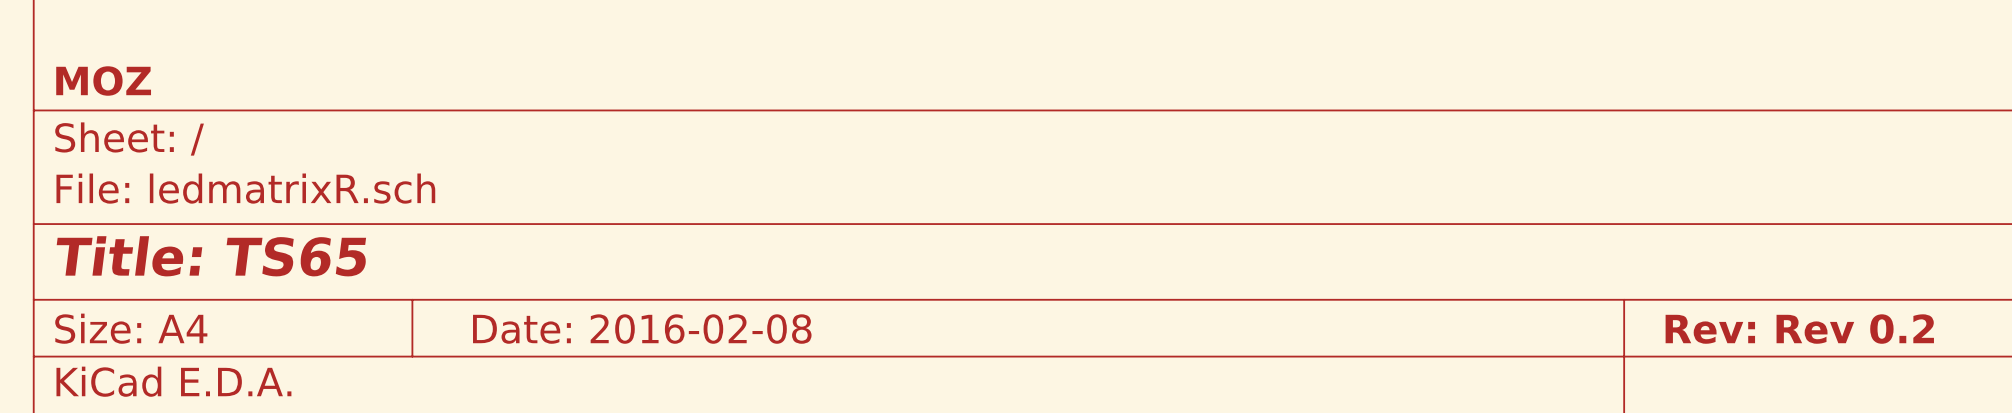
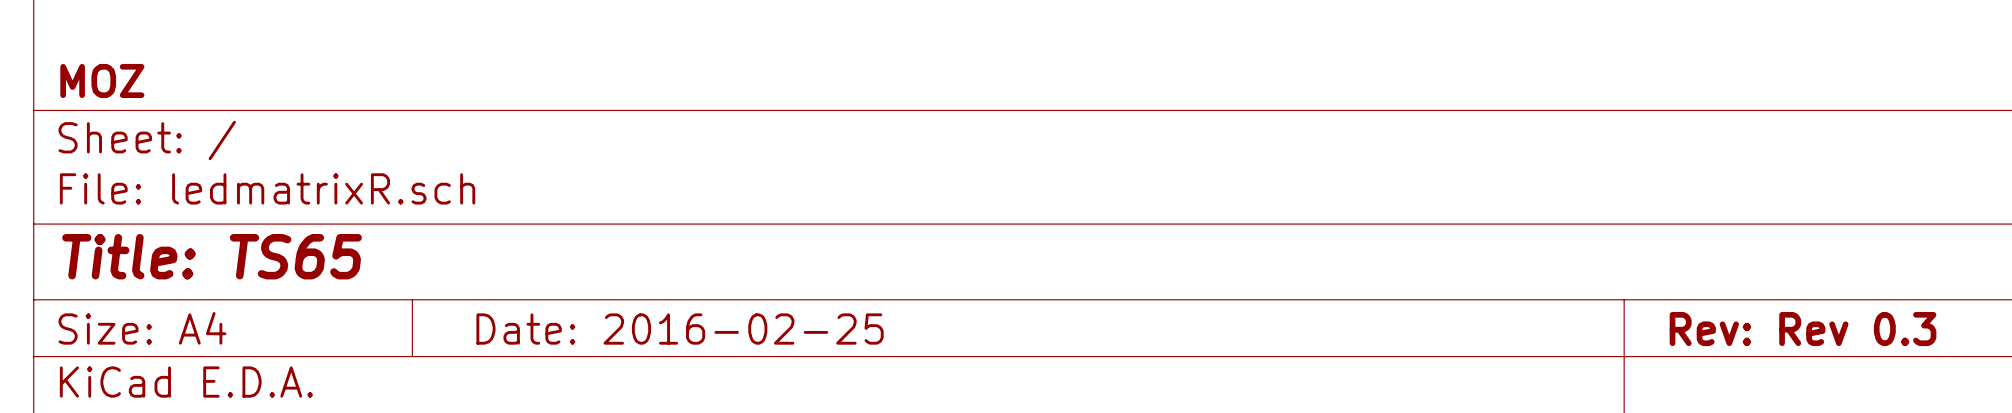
title block: Date: 2016-02-08 (642, 329) -> Date: 2016-02-25 (680, 329)
title block: Rev: Rev 0.2 (1799, 329) -> Rev: Rev 0.3 (1803, 329)

